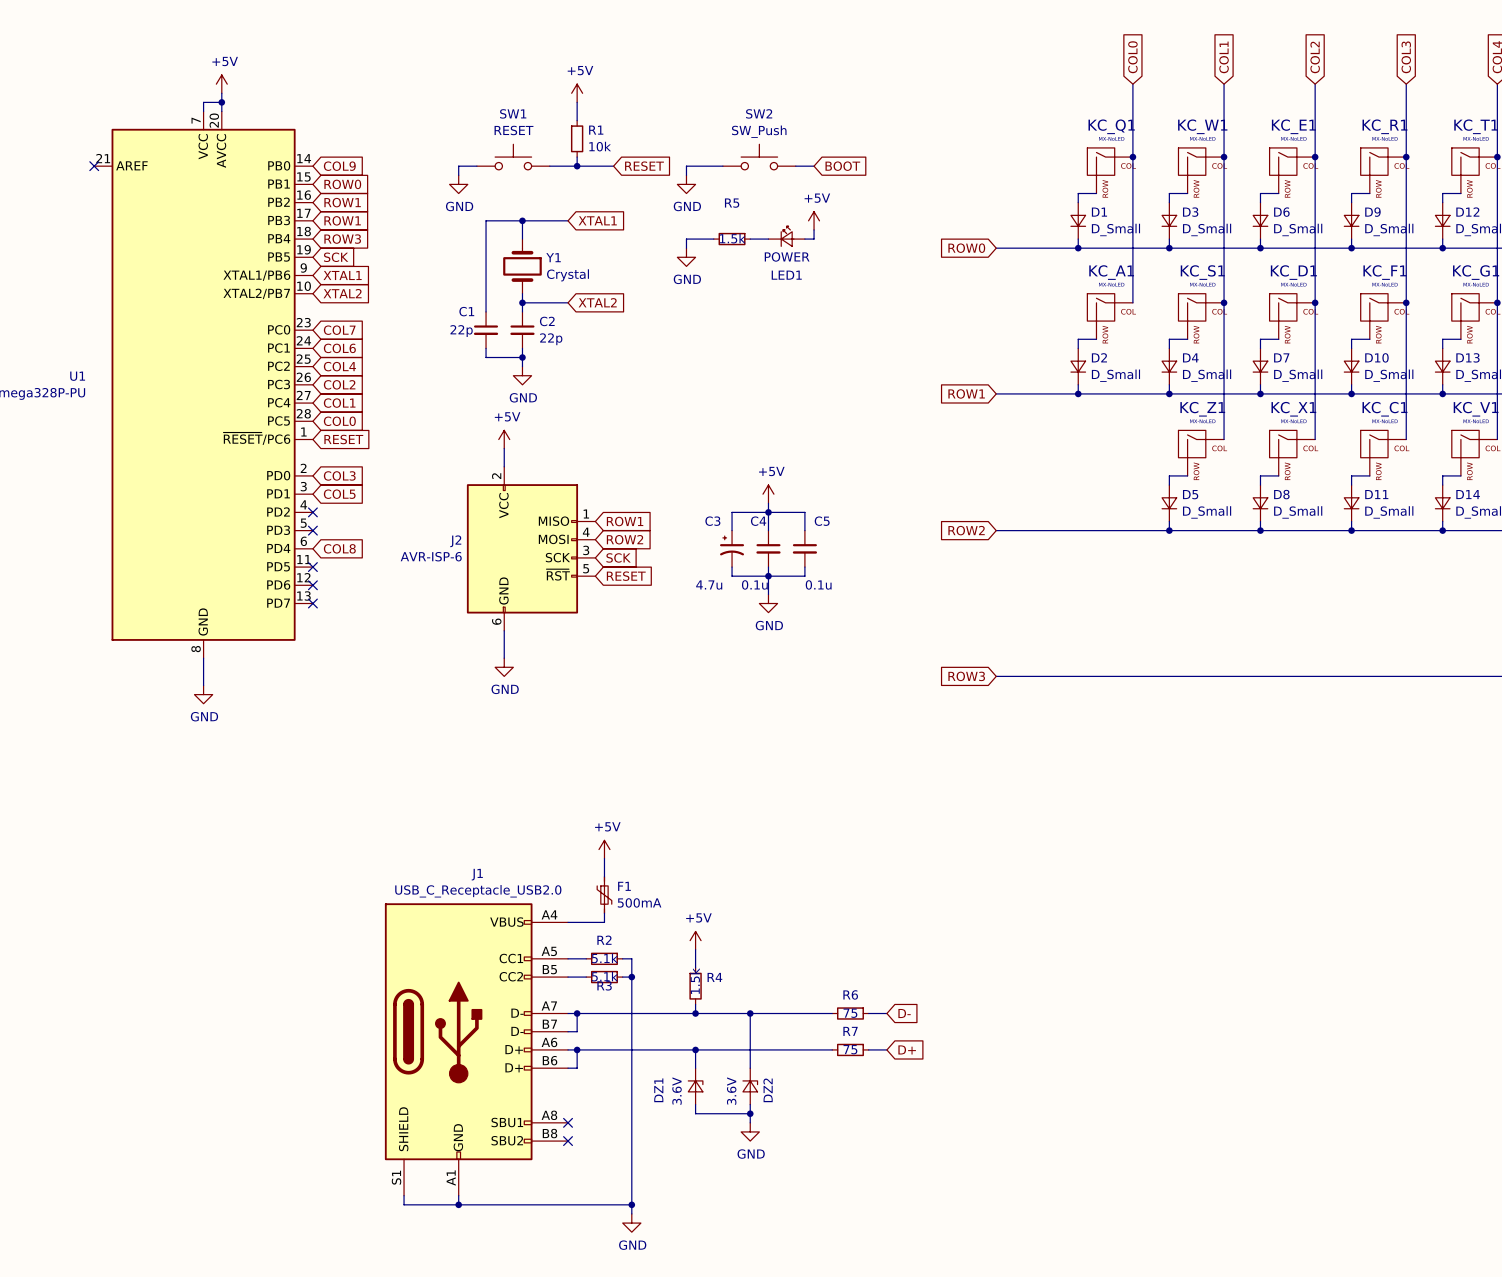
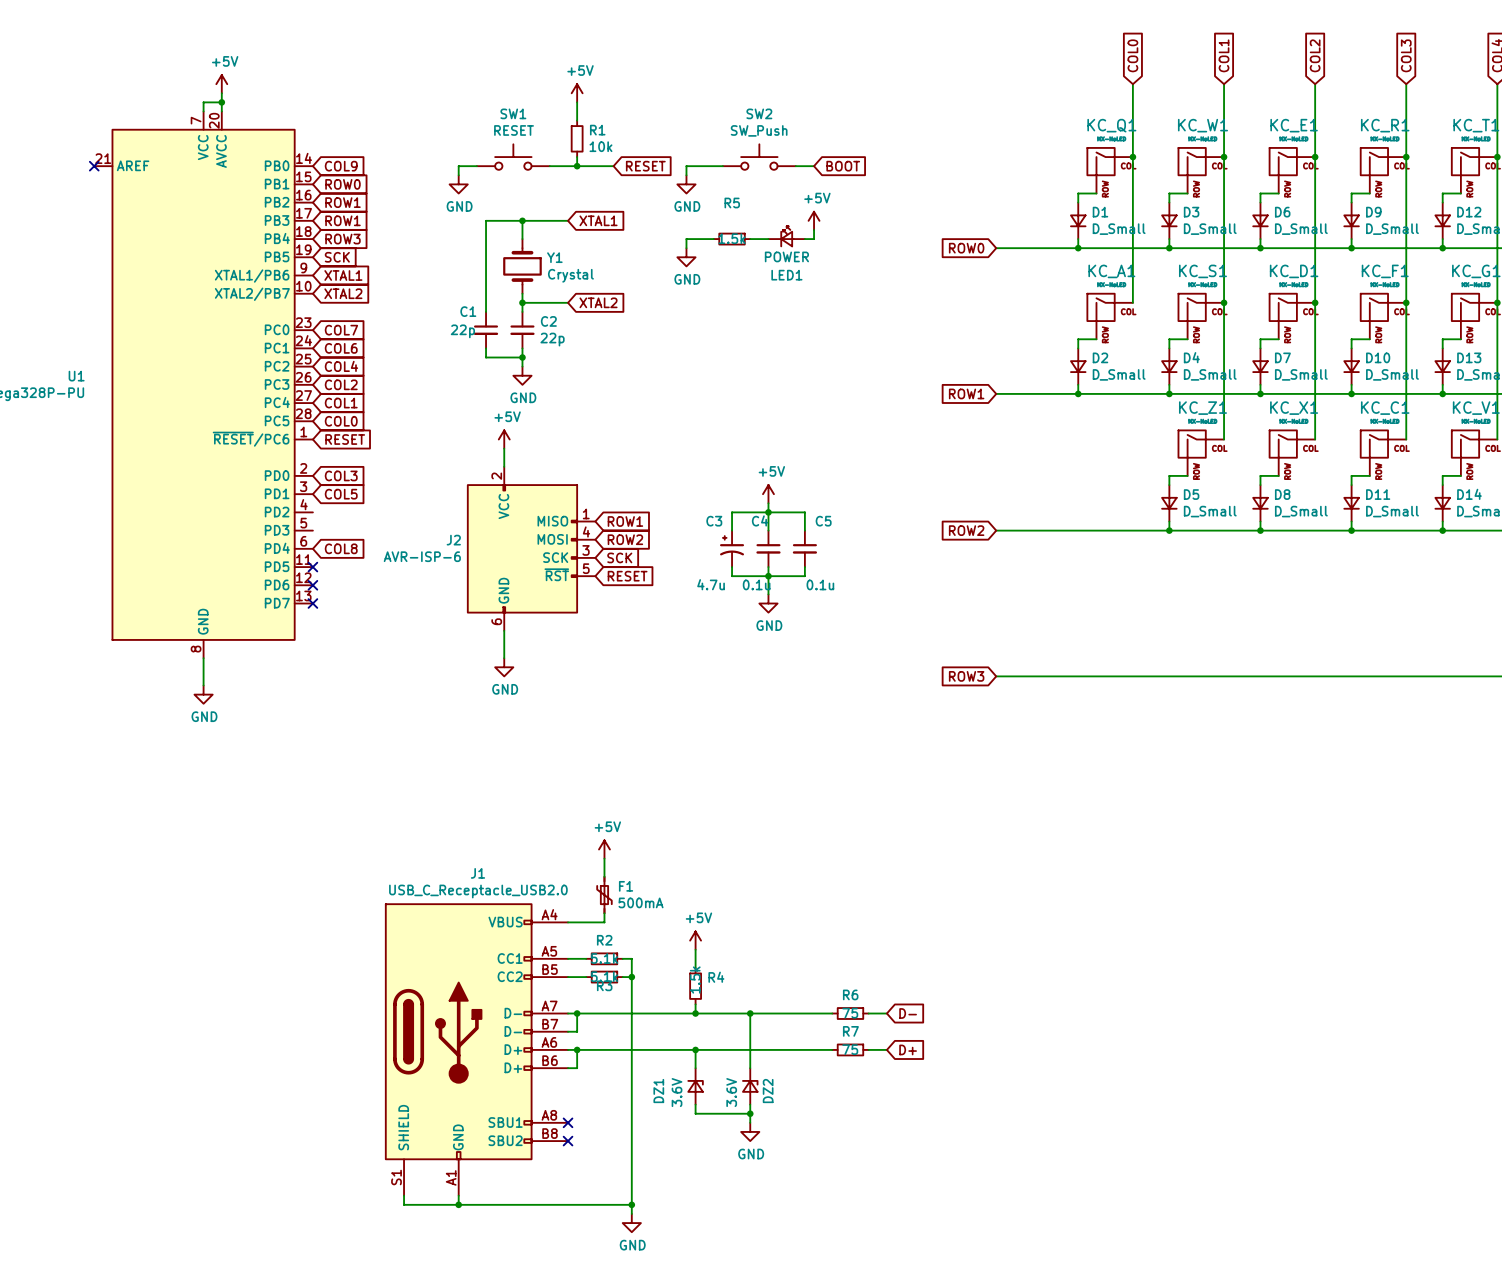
no-connect mark: (312, 512) -> none
no-connect mark: (312, 530) -> none

